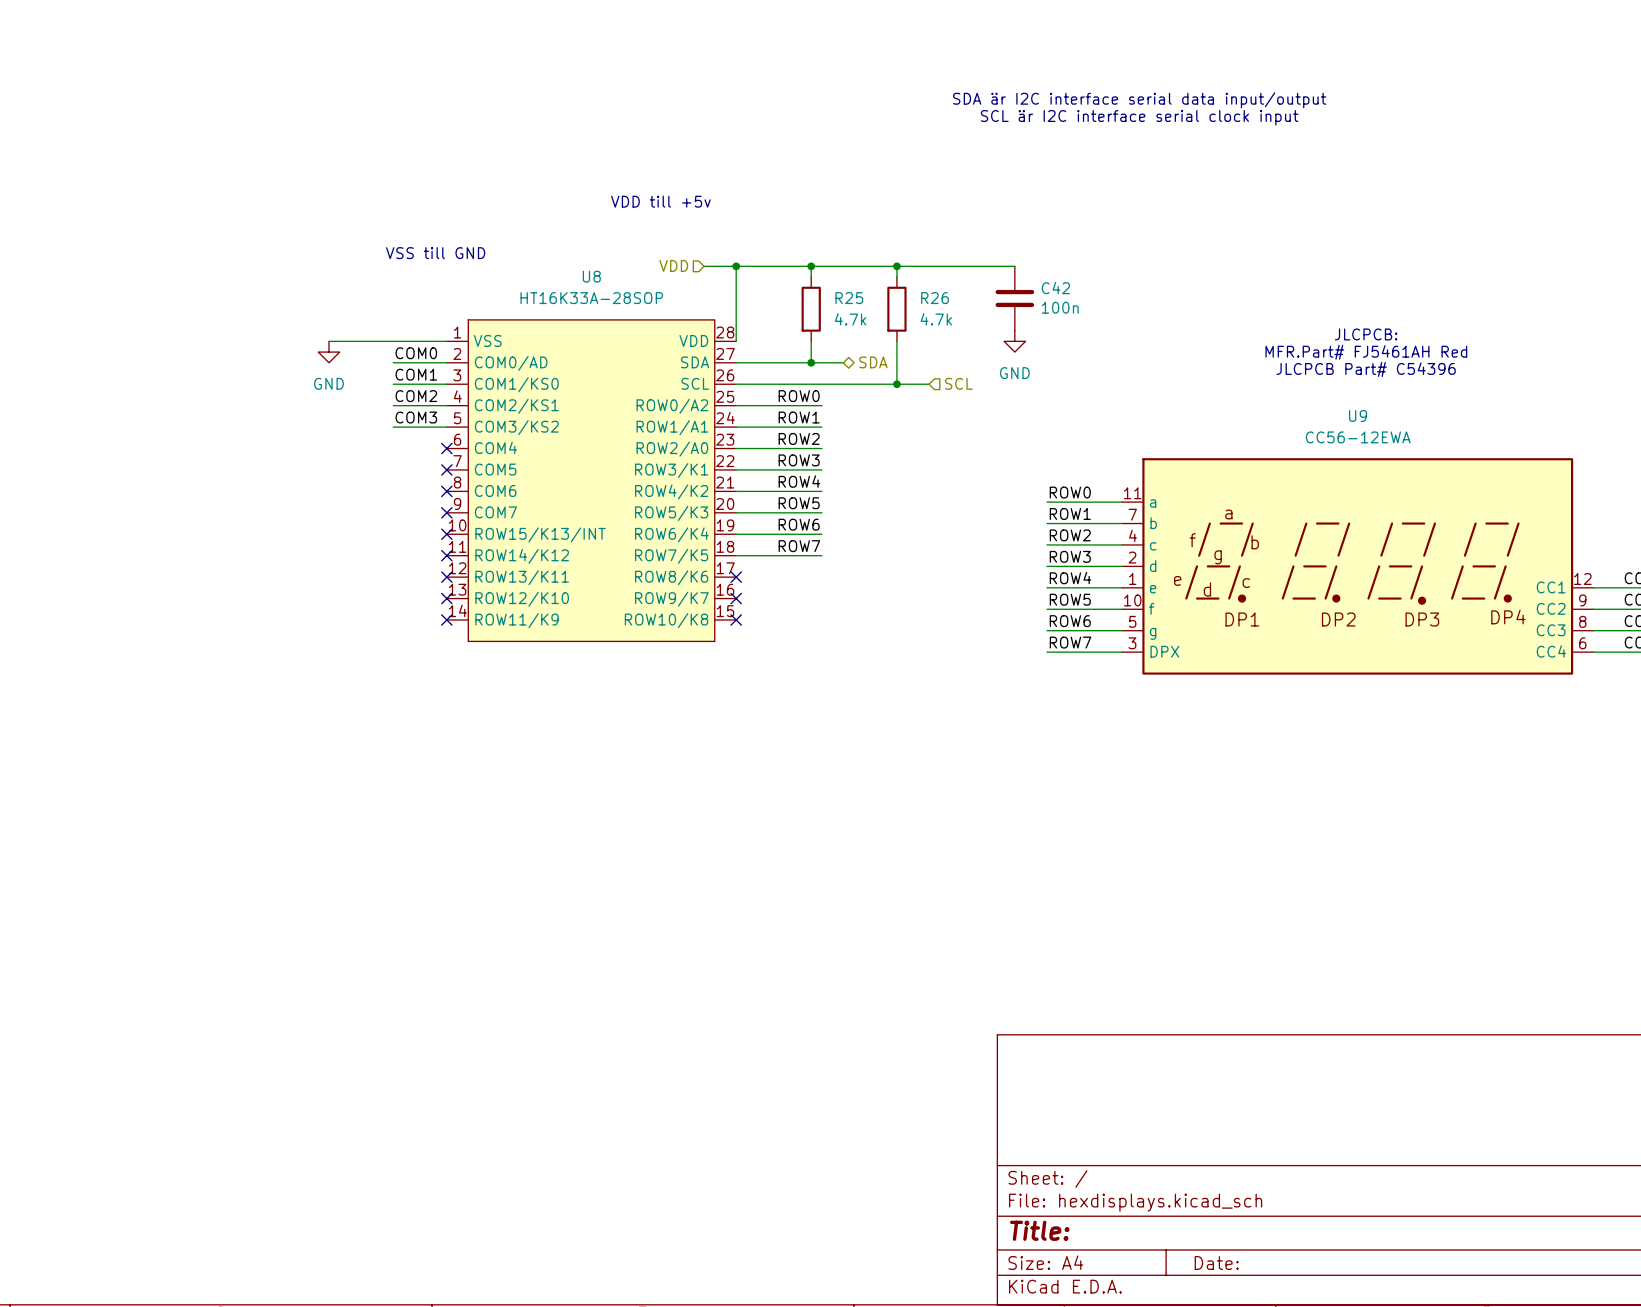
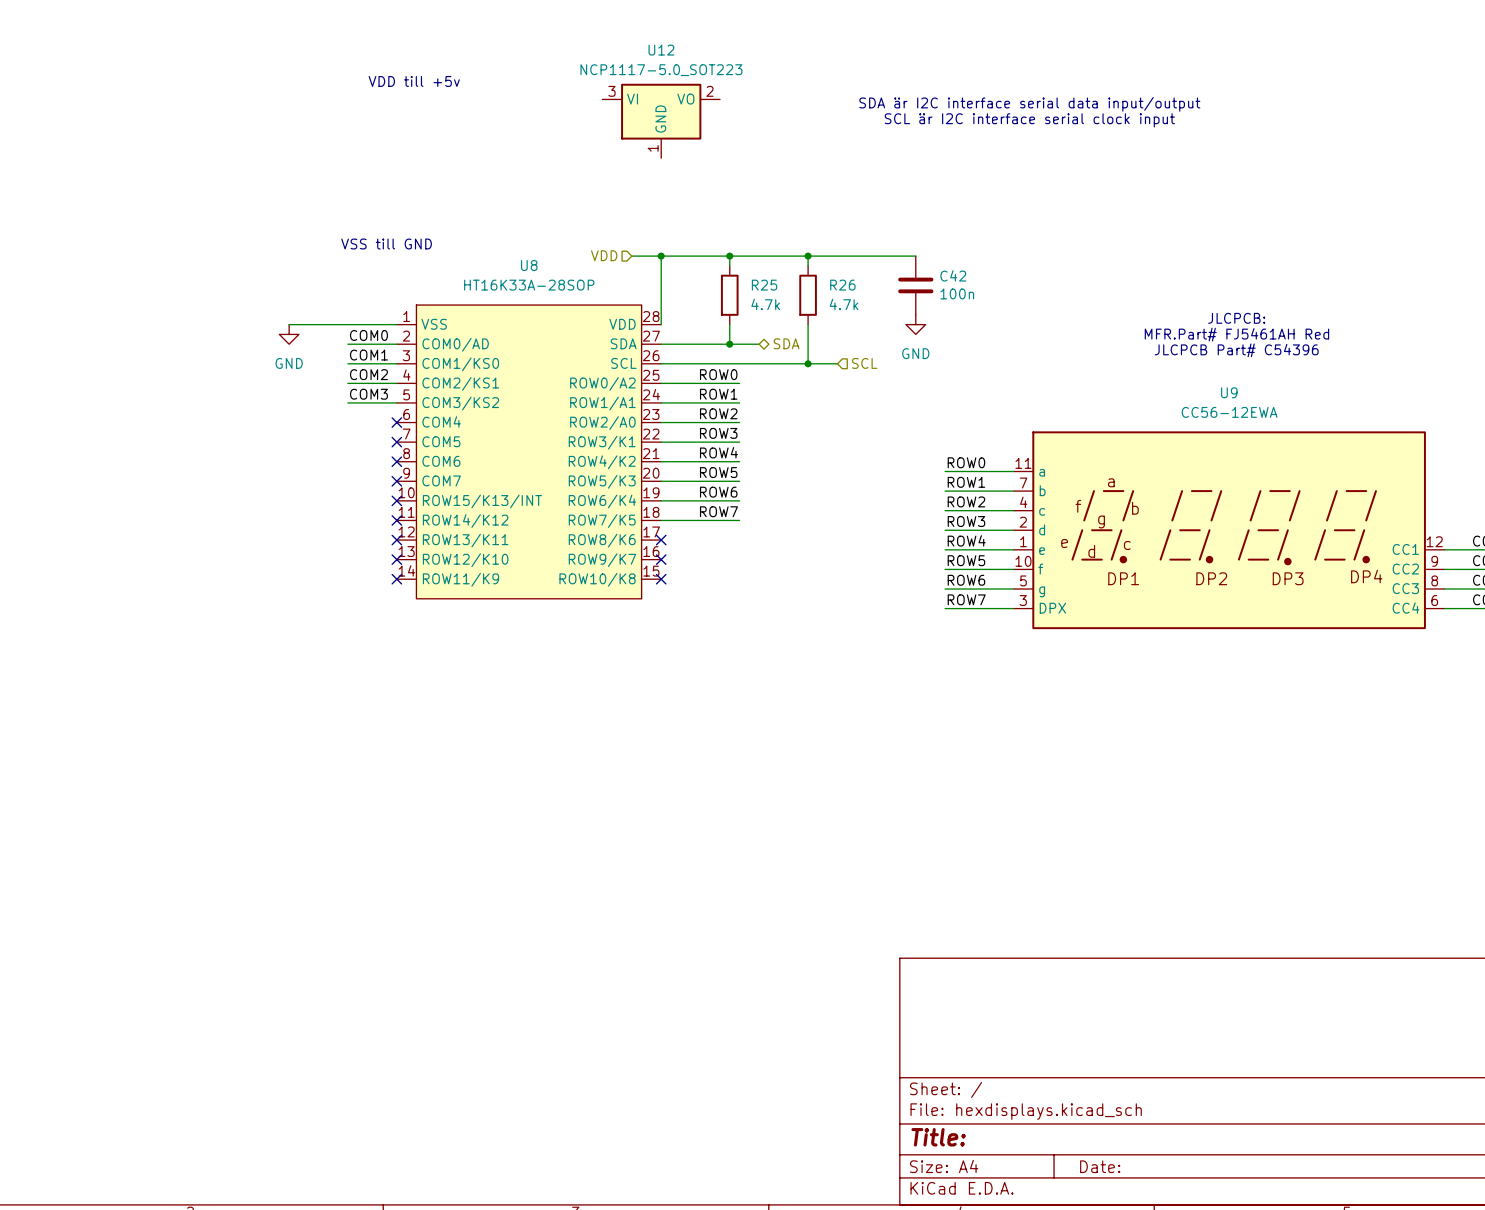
text: none -> VDD till +5v (414, 81)
U12: none -> NCP1117-5.0_SOT223 (661, 120)
text: VDD till +5v (660, 201) -> none

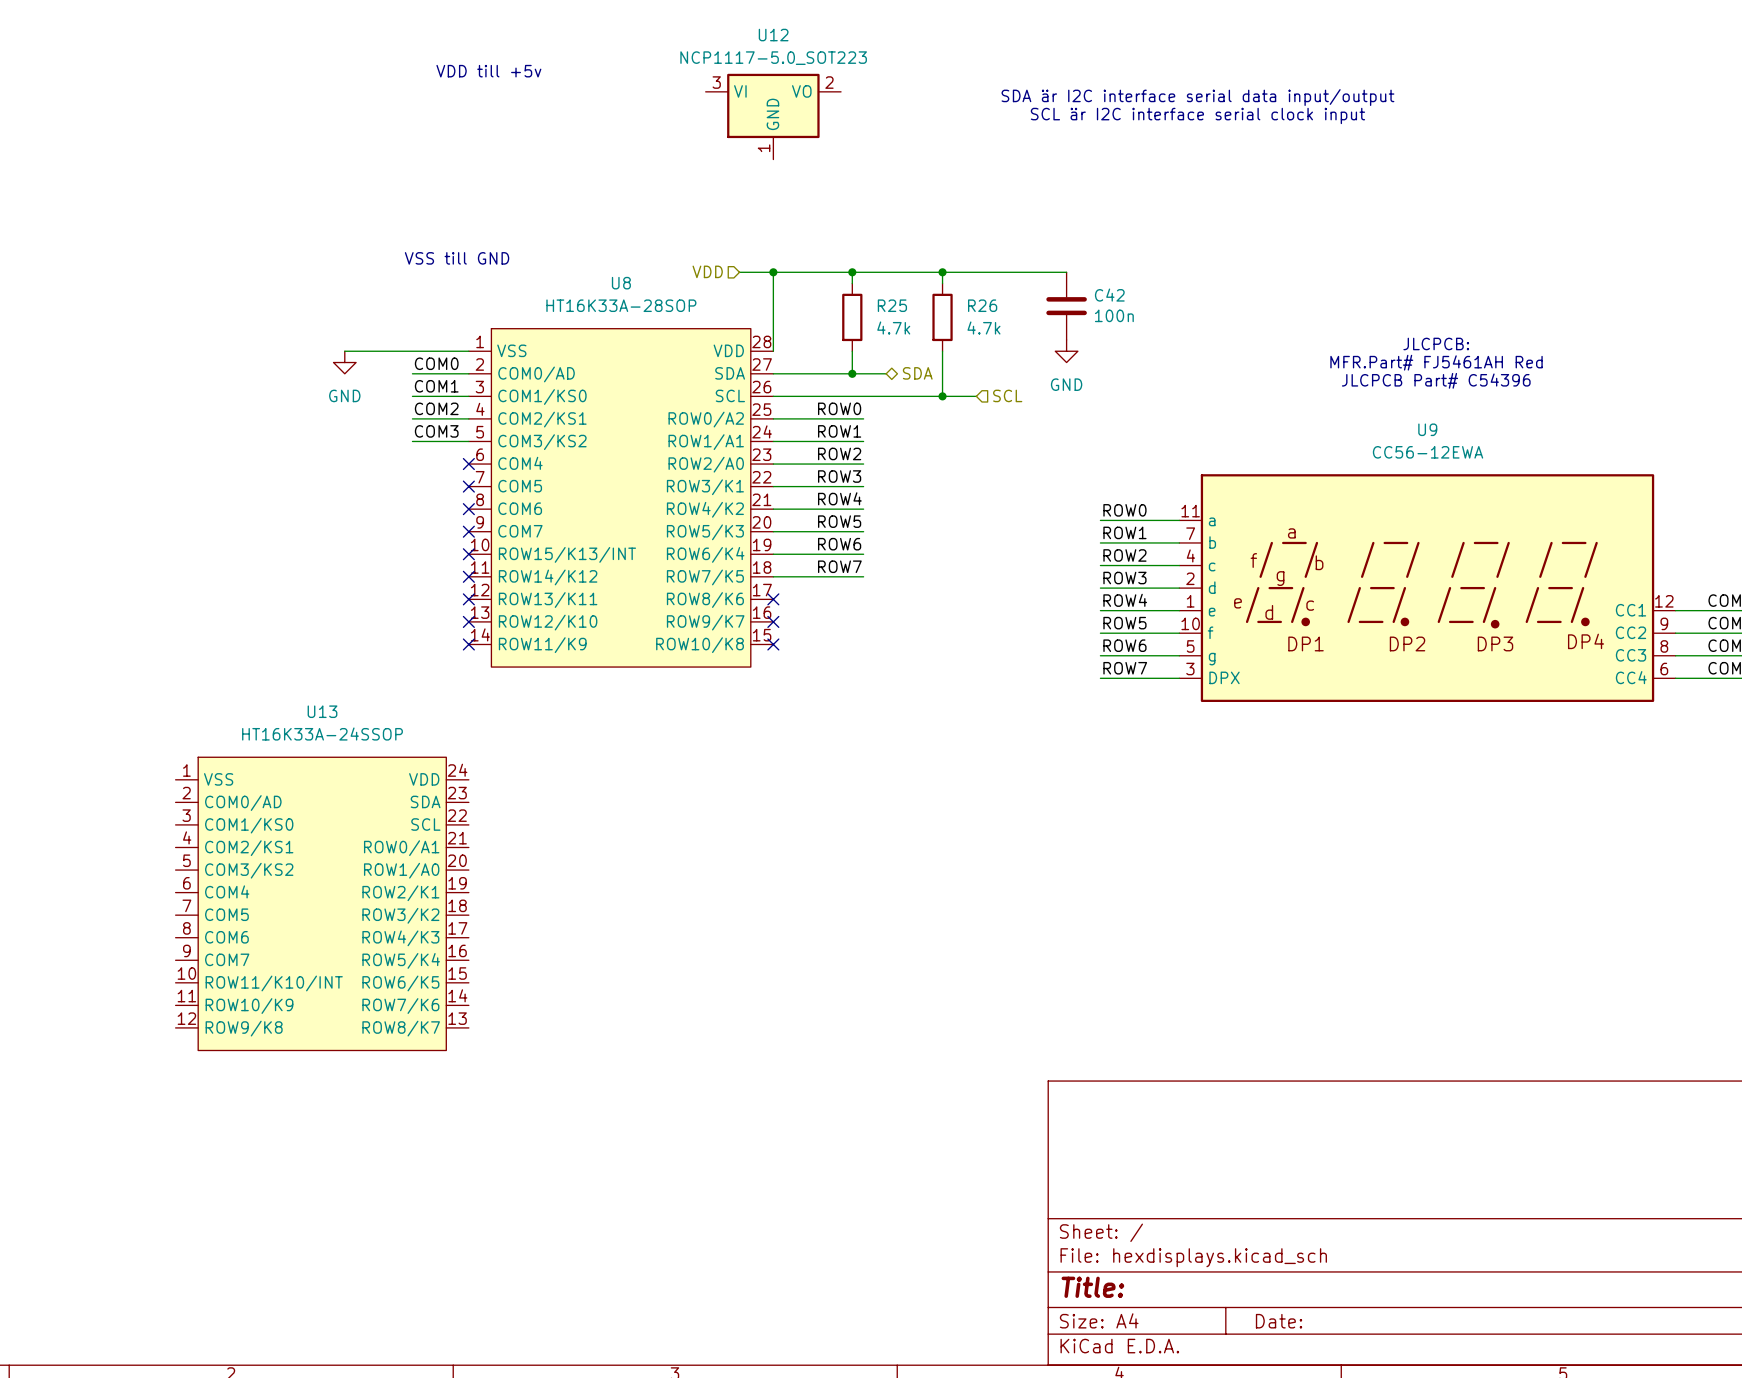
U13: none -> HT16K33A-24SSOP (322, 903)

